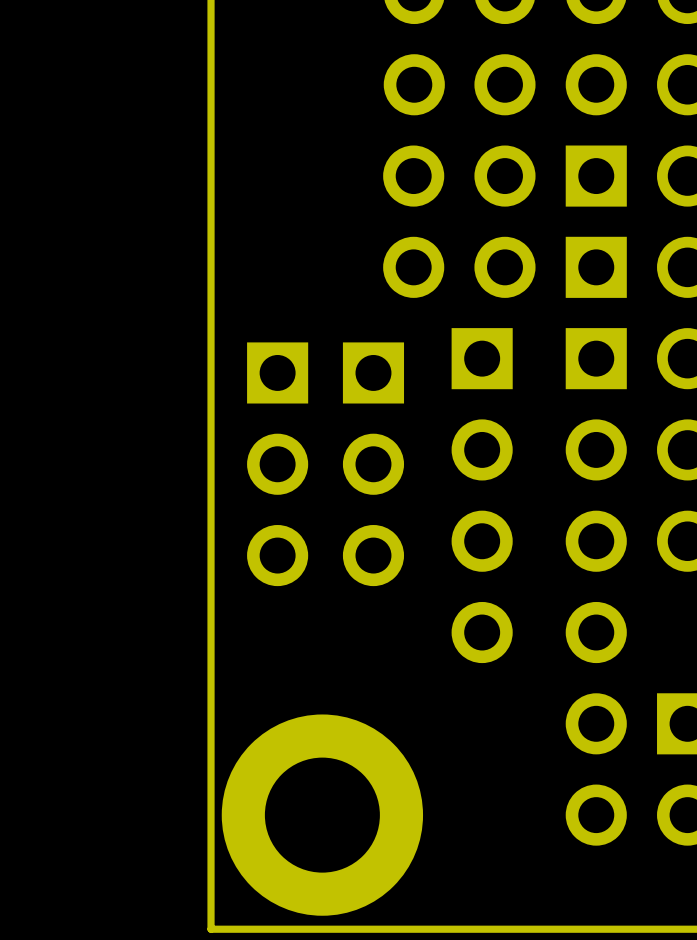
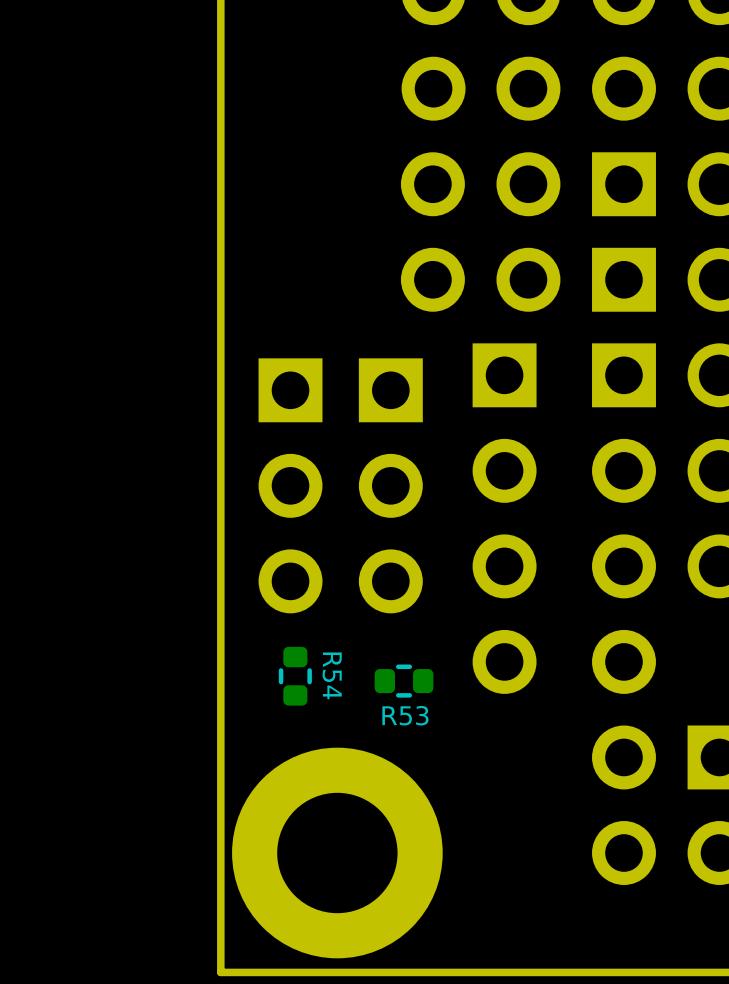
R54: none -> (295, 676)
R53: none -> (404, 681)

